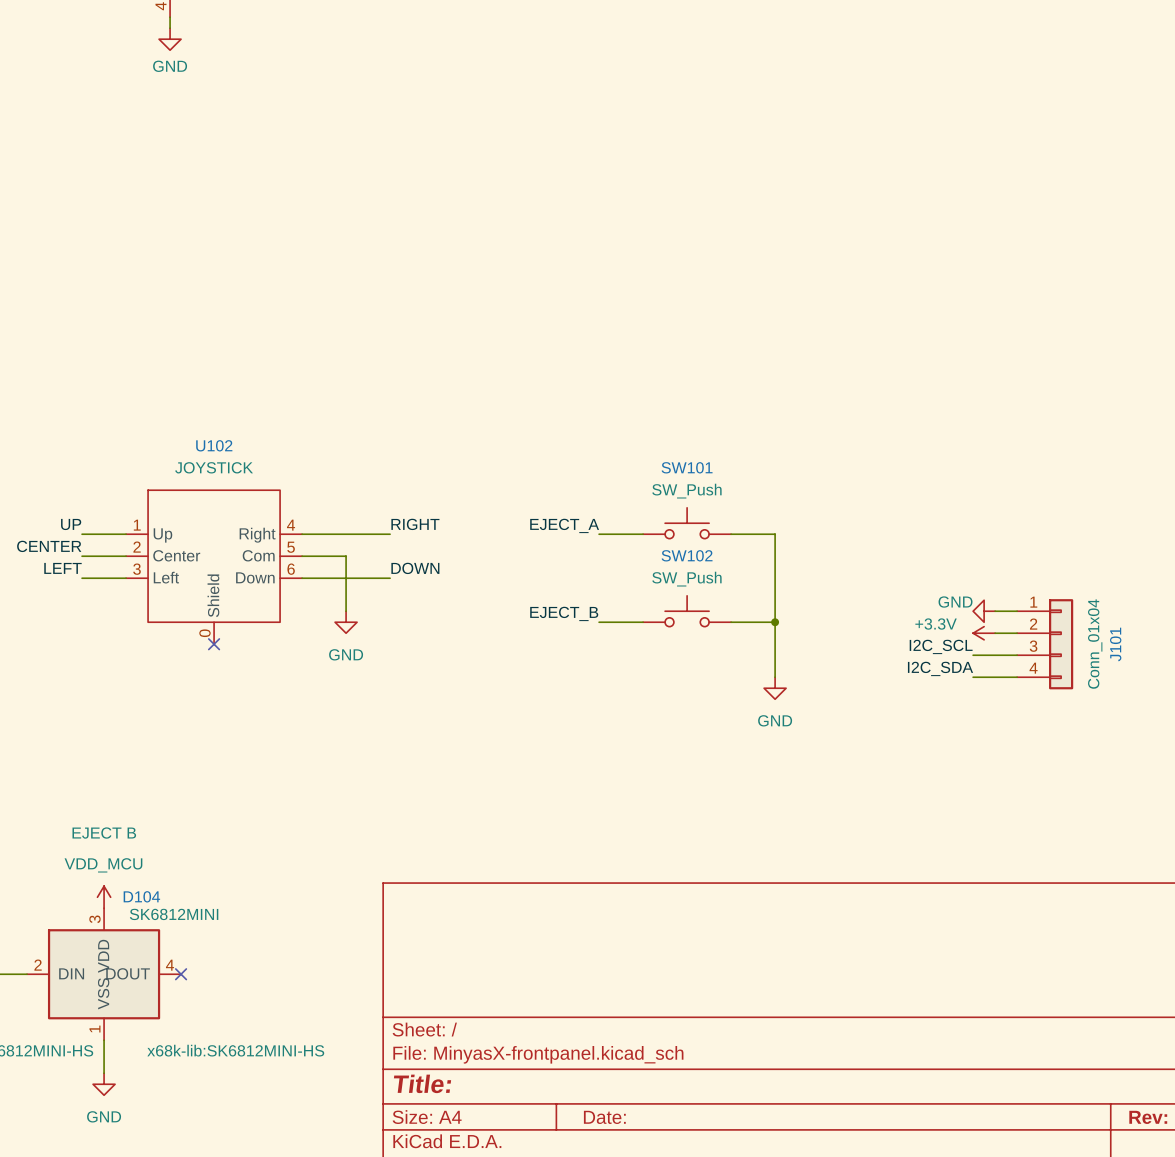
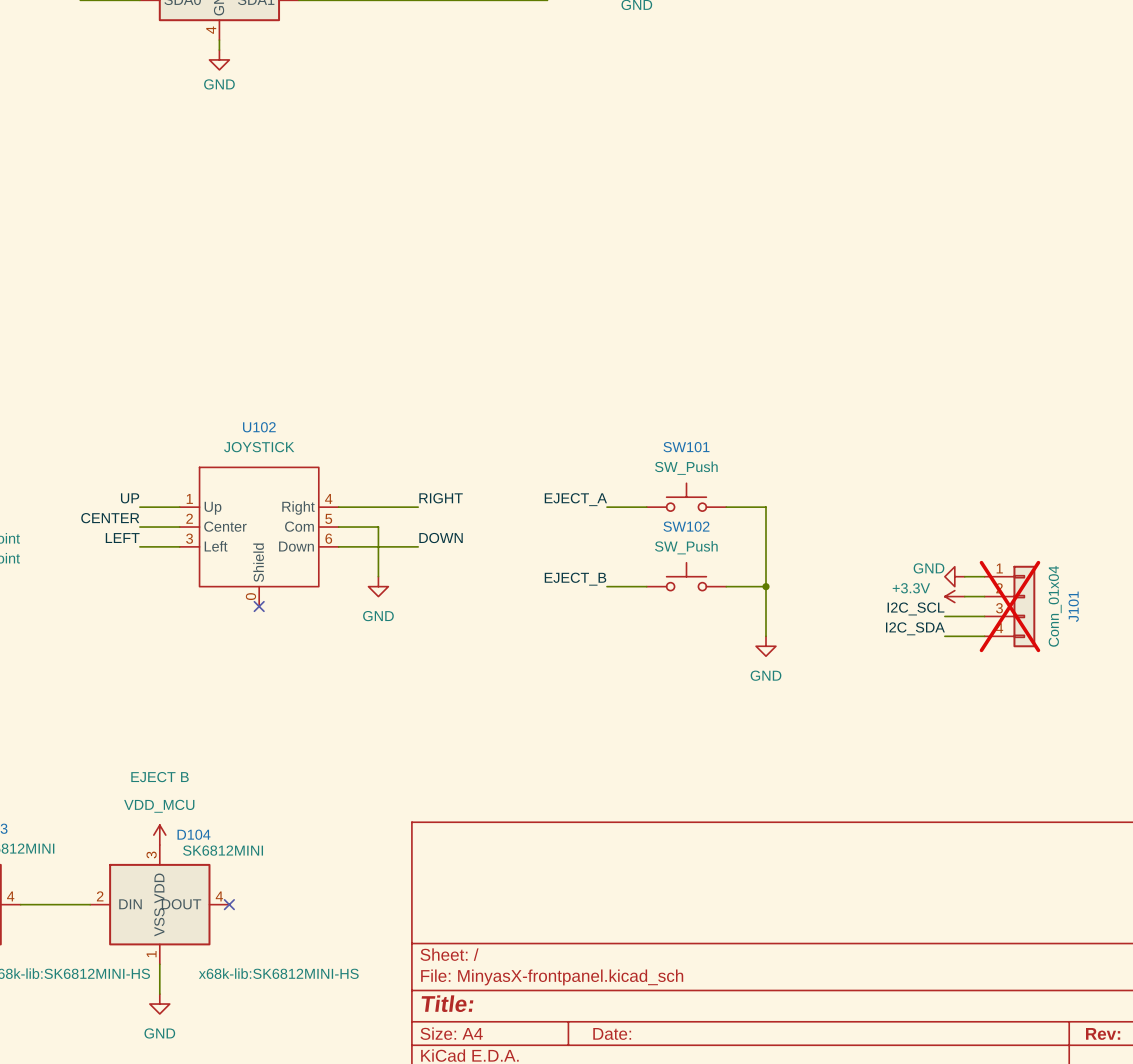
J101 do-not-place cross: none -> (1009, 606)

